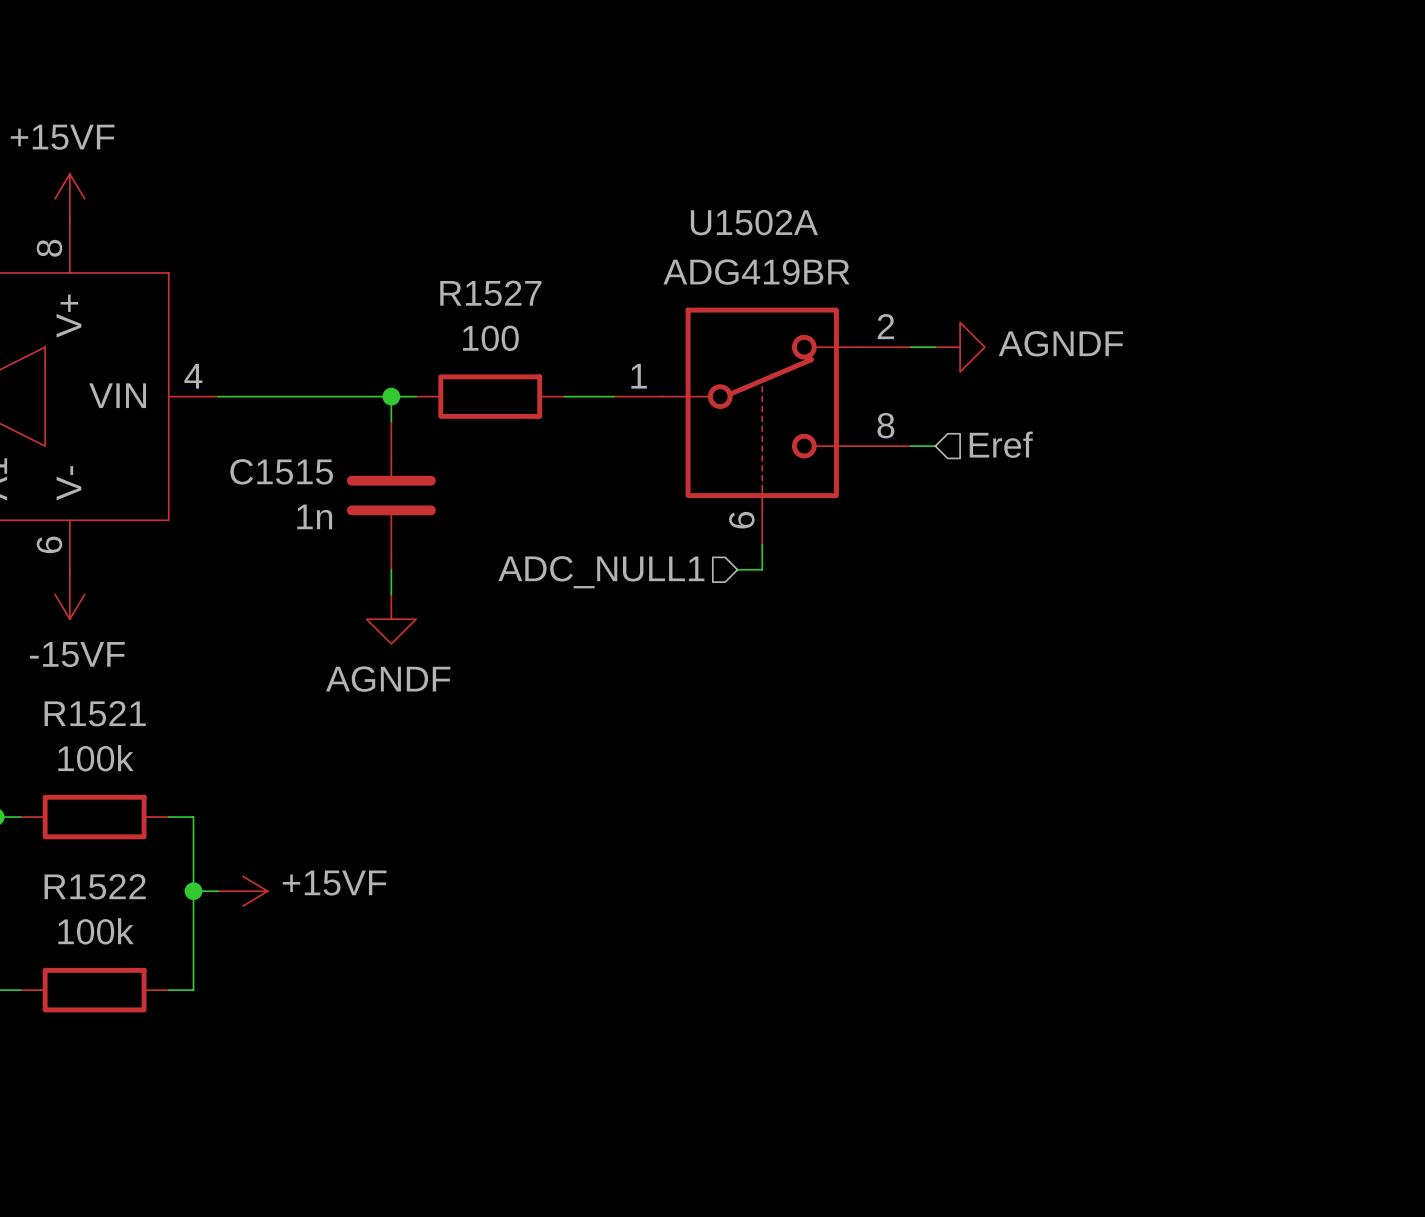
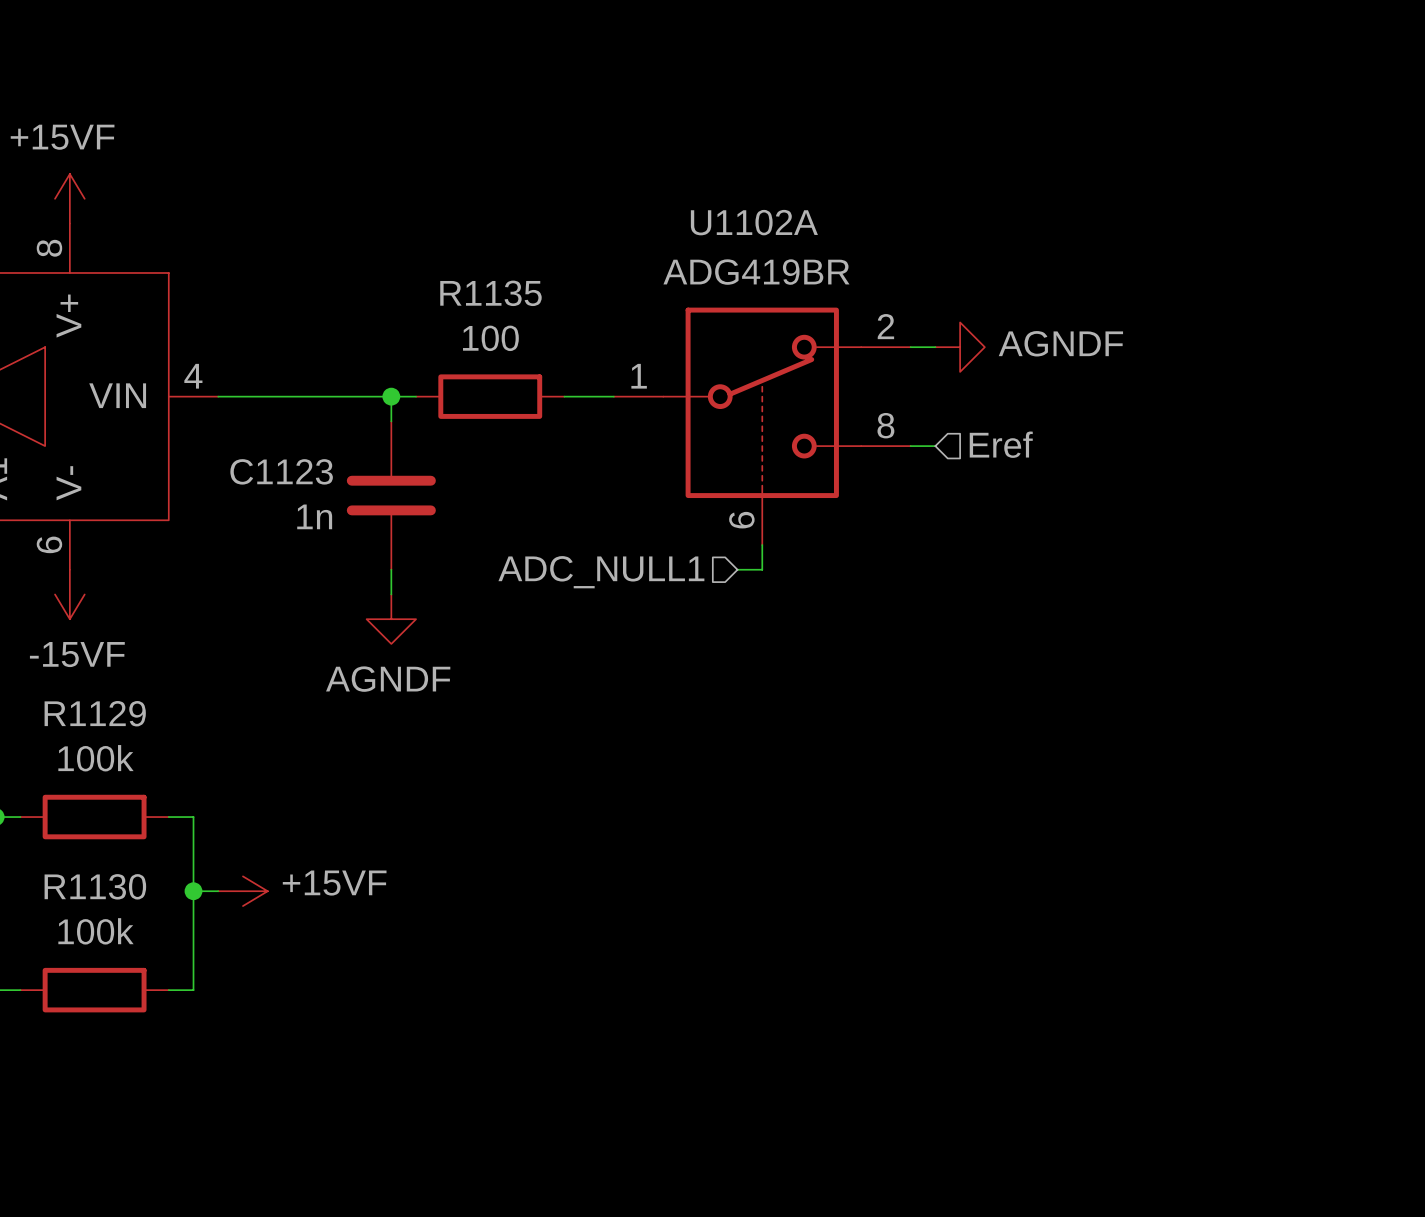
U1502A name: U1502A (754, 222) -> U1102A (754, 222)
R1527 name: R1527 (490, 293) -> R1135 (490, 293)
C1515 name: C1515 (281, 471) -> C1123 (281, 471)
R1521 name: R1521 (95, 713) -> R1129 (95, 713)
R1522 name: R1522 (95, 886) -> R1130 (95, 886)

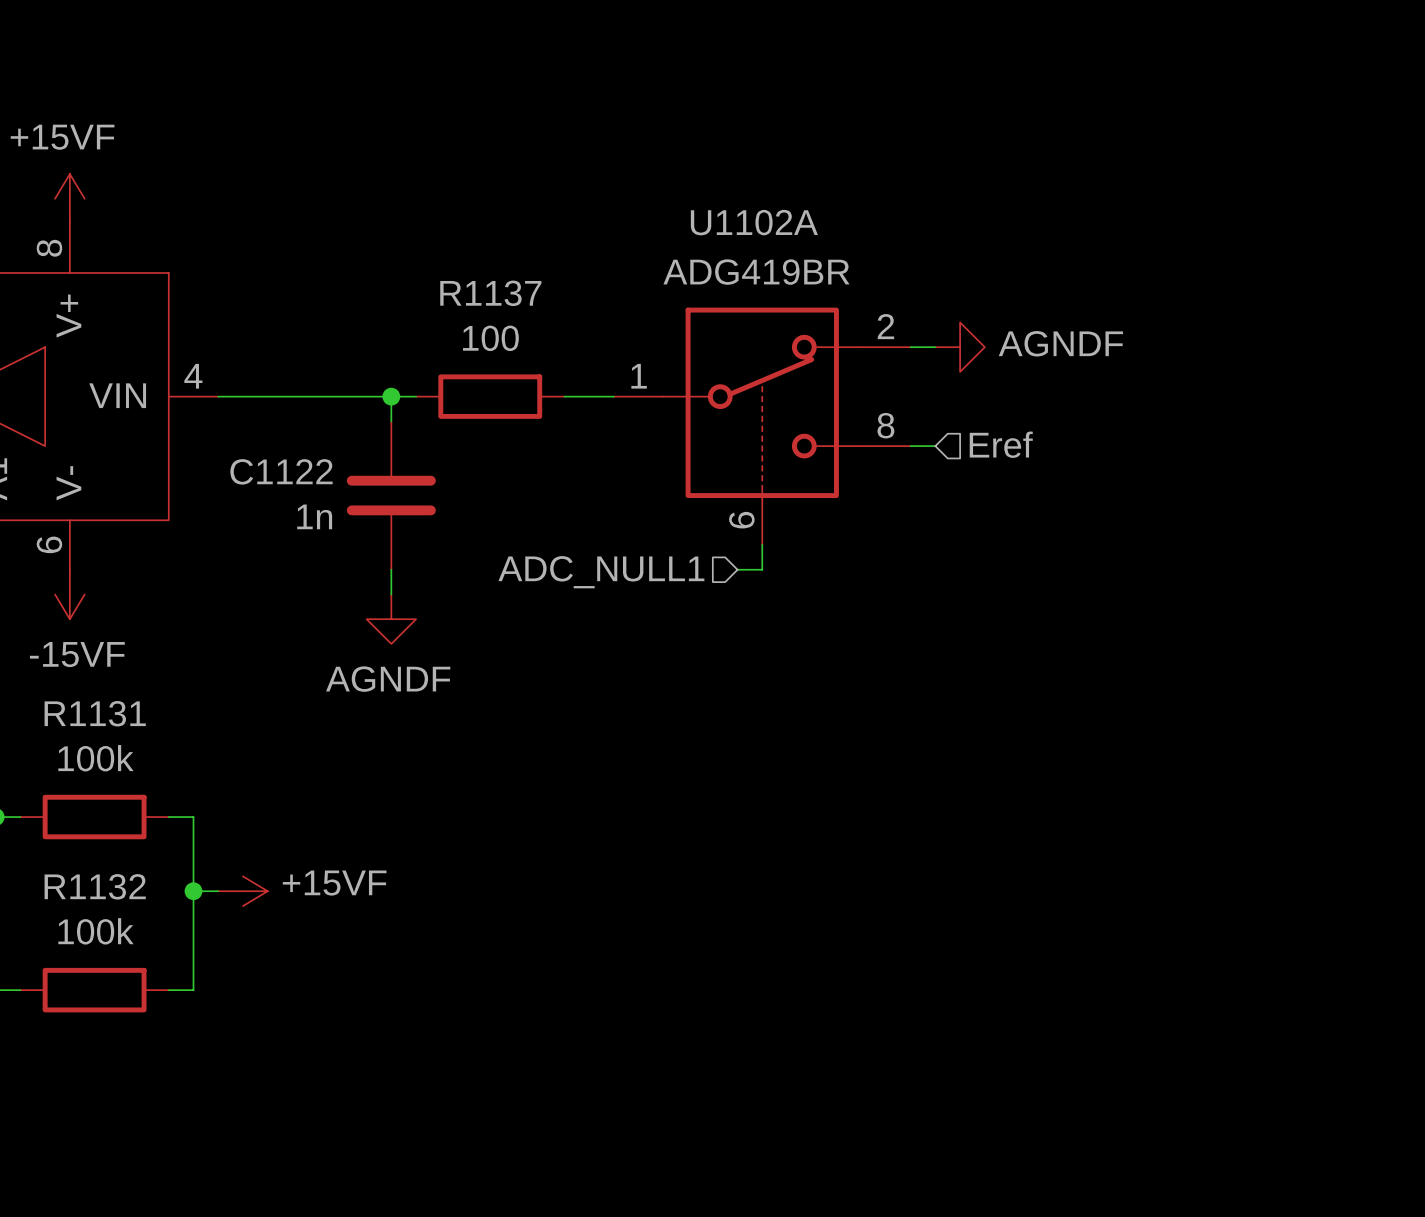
R1135 name: R1135 (490, 293) -> R1137 (490, 293)
C1123 name: C1123 (281, 471) -> C1122 (281, 471)
R1129 name: R1129 (95, 713) -> R1131 (95, 713)
R1130 name: R1130 (95, 886) -> R1132 (95, 886)

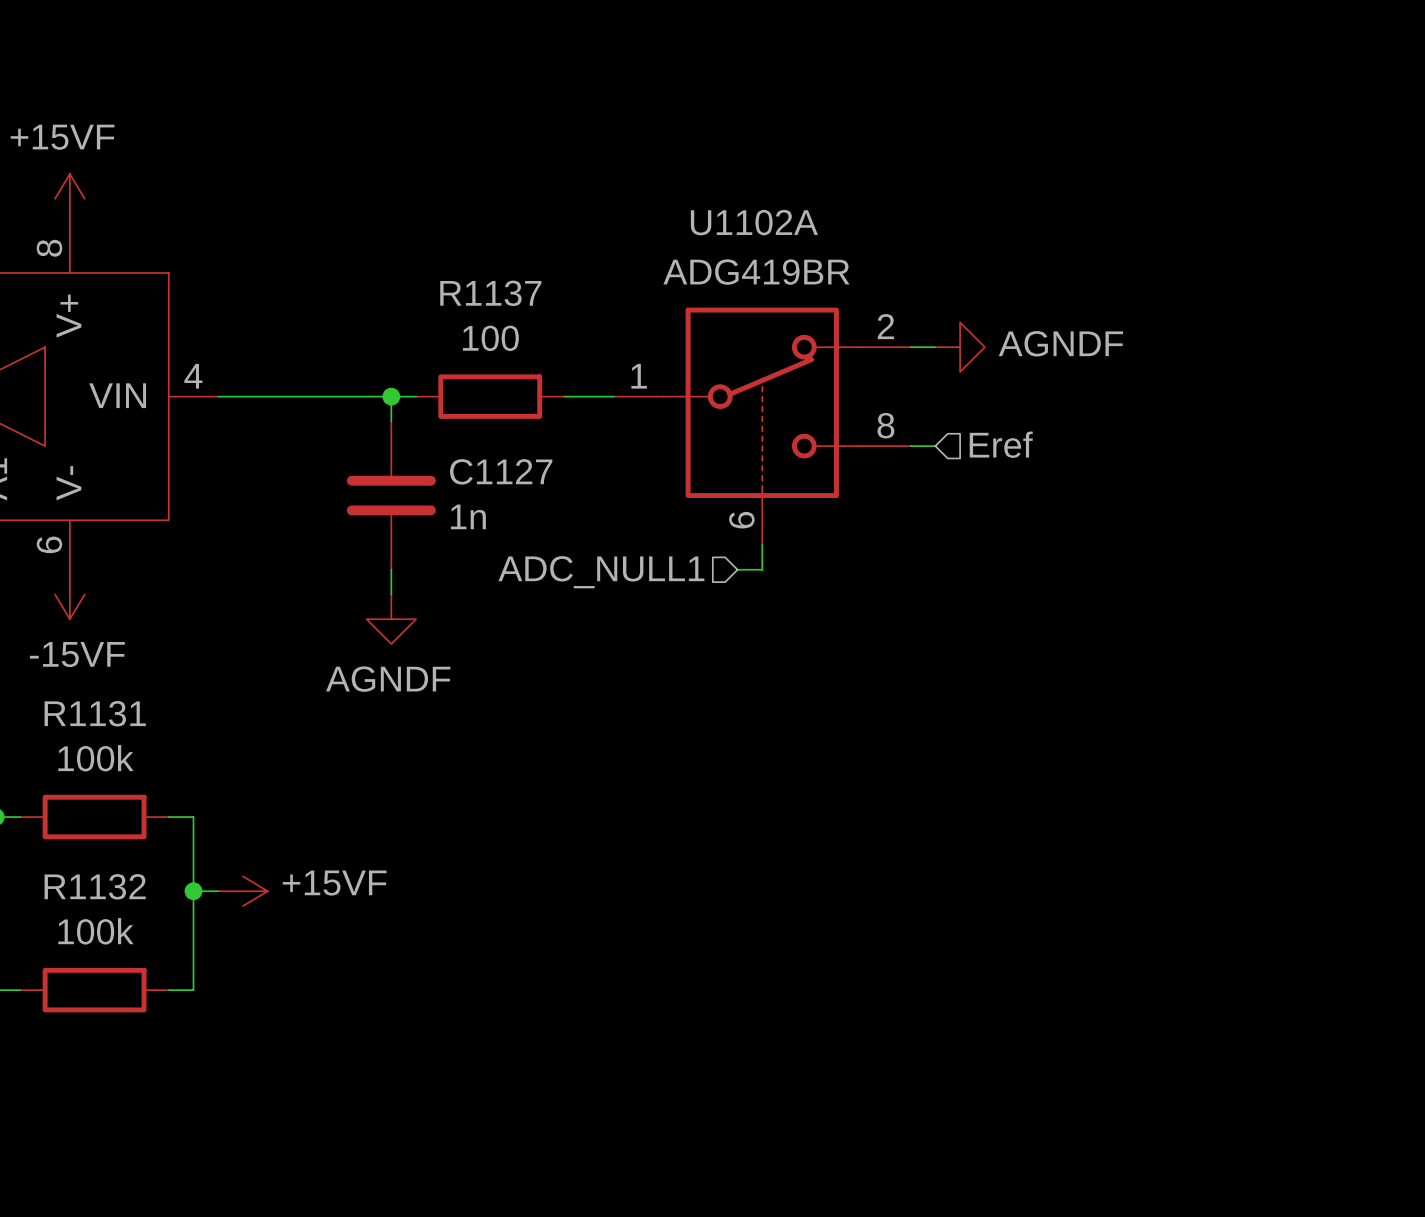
C1122 name: C1122 (281, 471) -> C1127 (501, 471)
C1122 value position: 1n (314, 516) -> 1n (468, 516)

